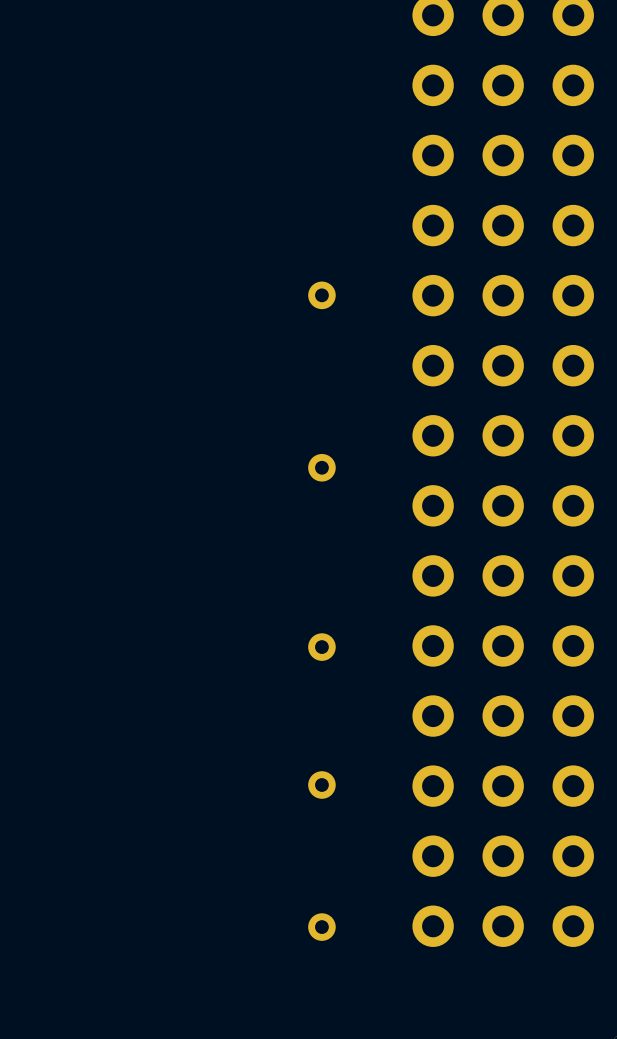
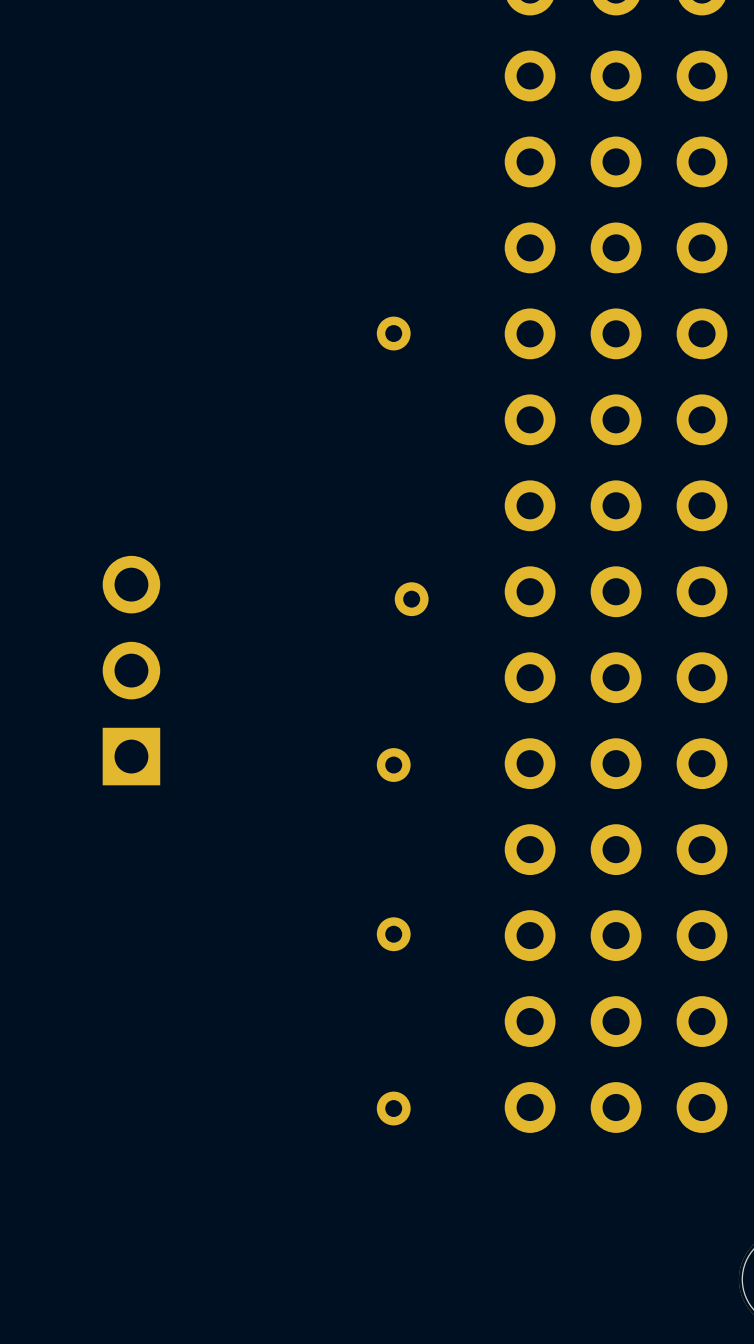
part position: (321, 467) -> (411, 599)
part: none -> (131, 670)

